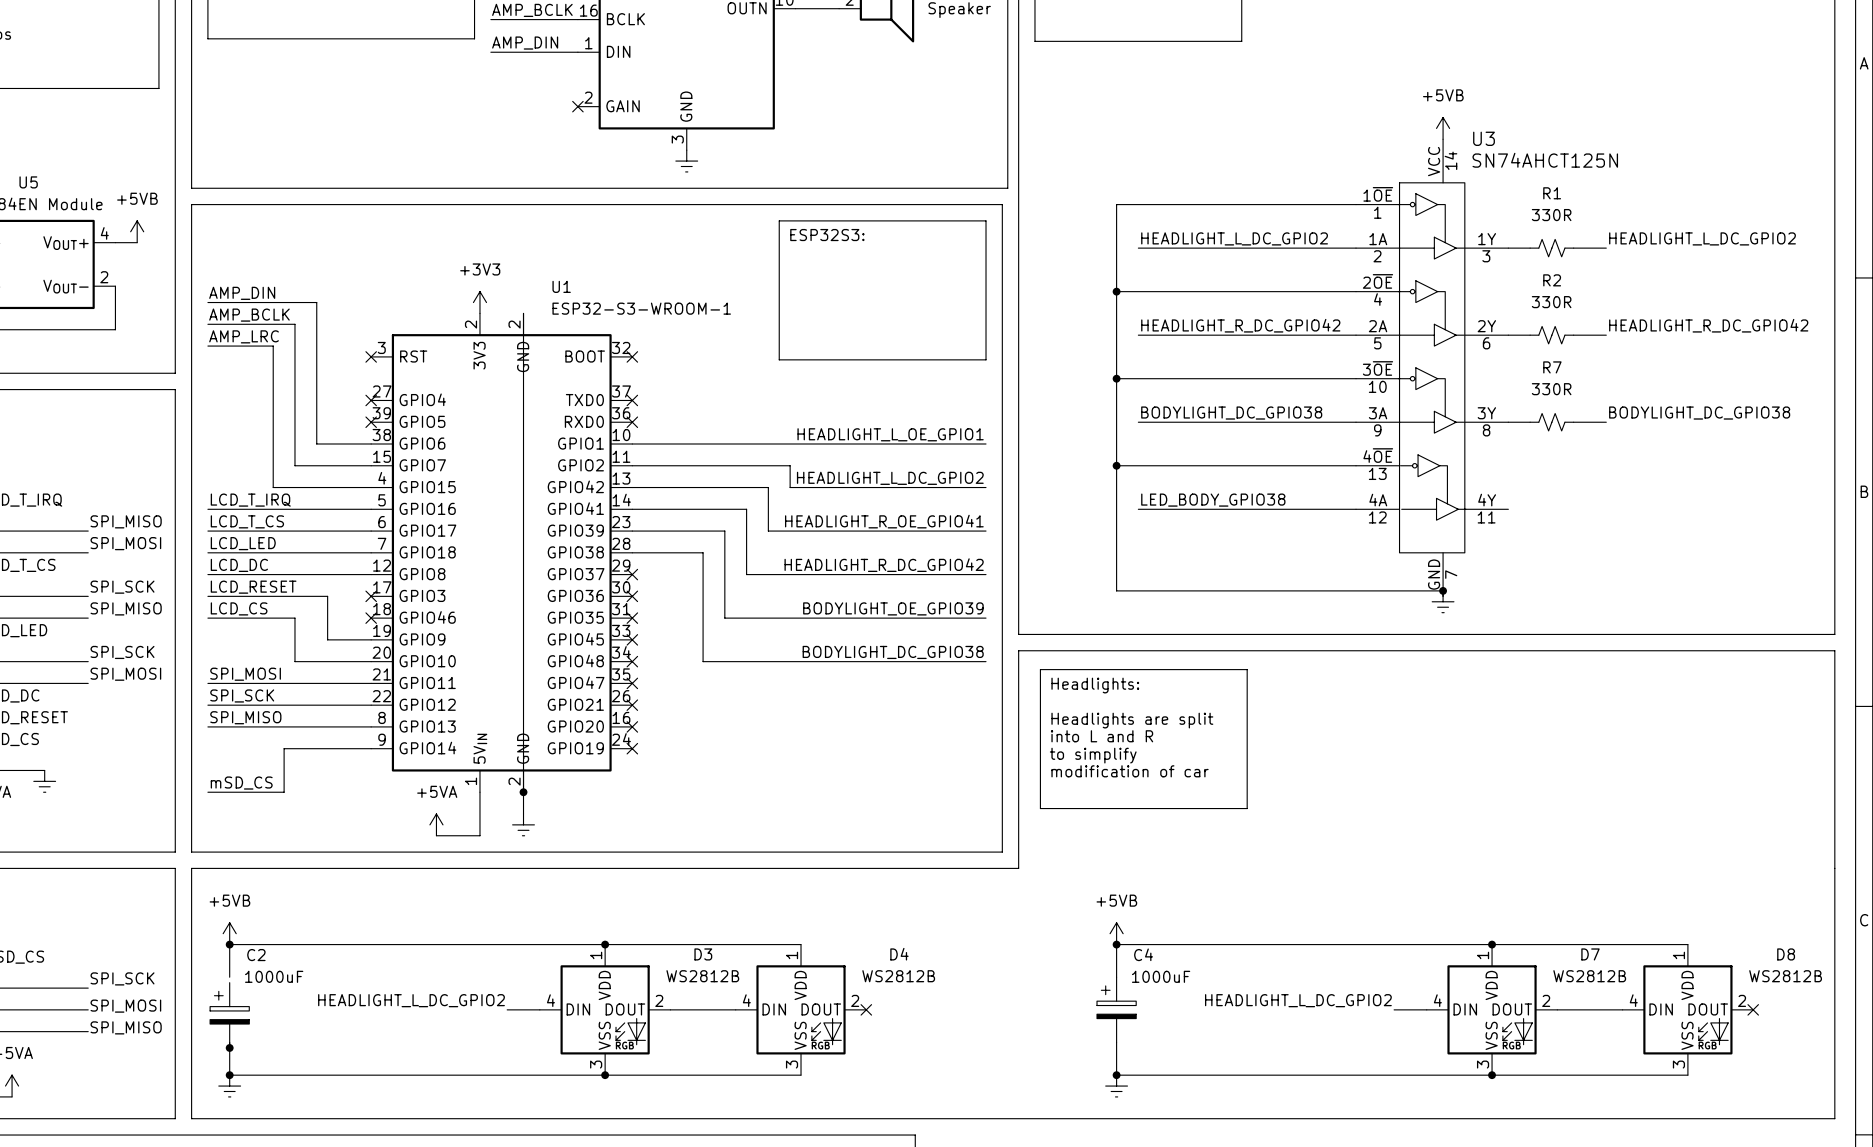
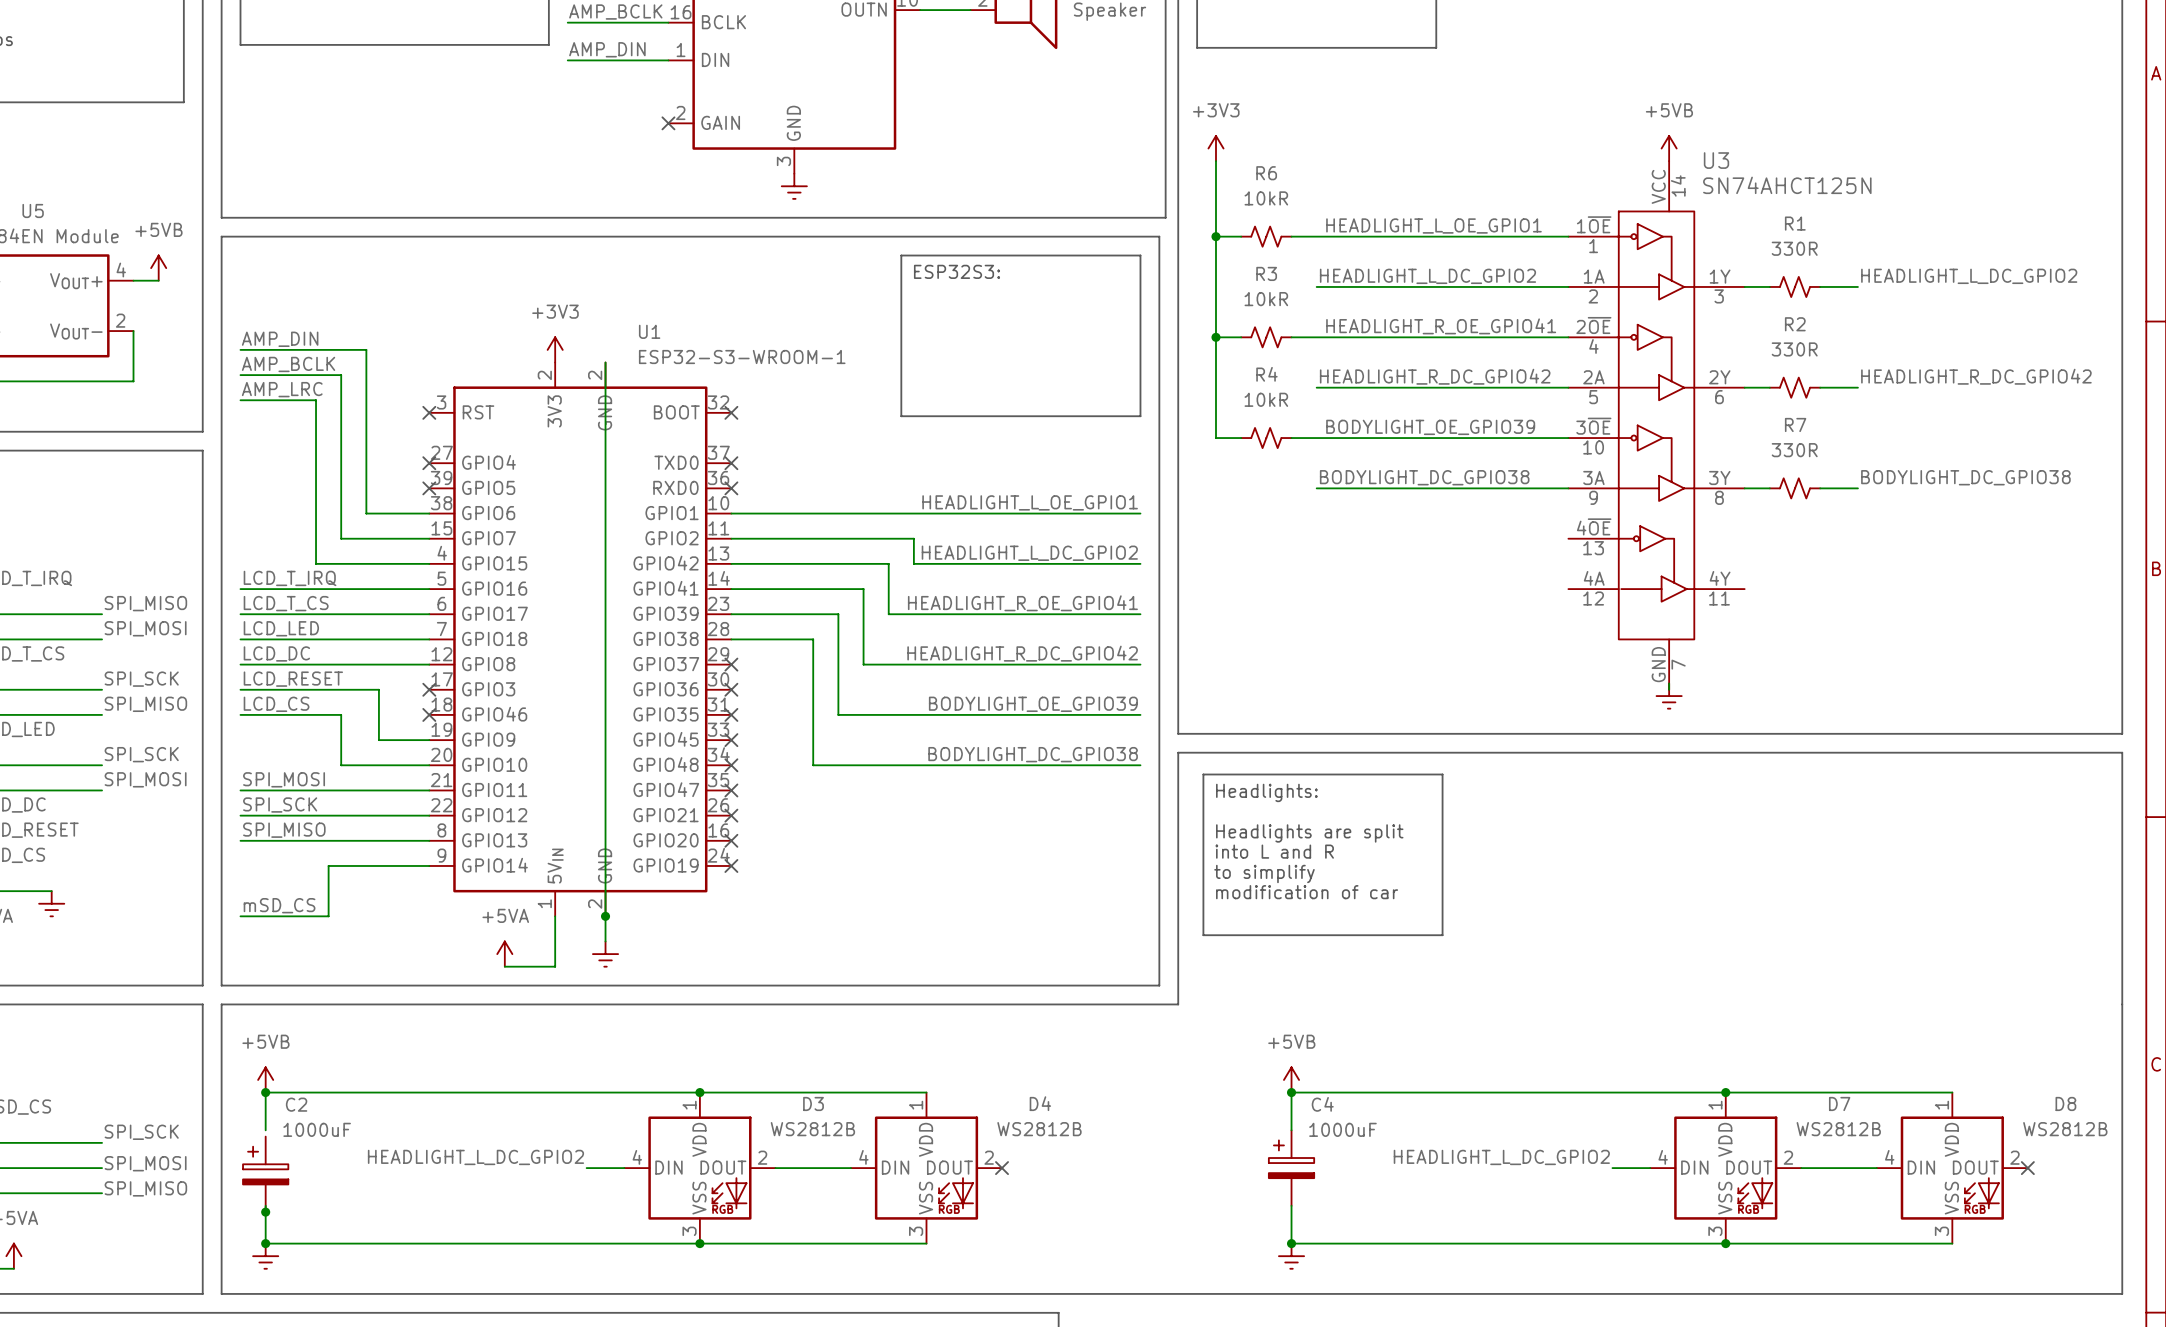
power symbol: none -> +3V3 (1215, 148)
wire: none -> (1215, 161) (1215, 438) (1241, 438)
label: none -> HEADLIGHT_L_OE_GPIO1 (1433, 226)
wire: none -> (1215, 236) (1241, 236)
junction: none -> (1215, 236)
R6: none -> 10kR (1266, 236)
wire: (1116, 204) (1116, 590) (1443, 590) -> none
label: none -> HEADLIGHT_R_OE_GPIO41 (1441, 326)
wire: none -> (1215, 337) (1241, 337)
junction: none -> (1215, 337)
R3: none -> 10kR (1266, 337)
junction: (1116, 291) -> none
label: none -> BODYLIGHT_OE_GPIO39 (1430, 427)
R4: none -> 10kR (1266, 438)
junction: (1116, 378) -> none
wire: (1116, 465) (1356, 465) -> none
junction: (1116, 465) -> none
label: LED_BODY_GPIO38 (1213, 500) -> none
wire: (1138, 509) (1356, 509) -> none
junction: (1443, 590) -> none

